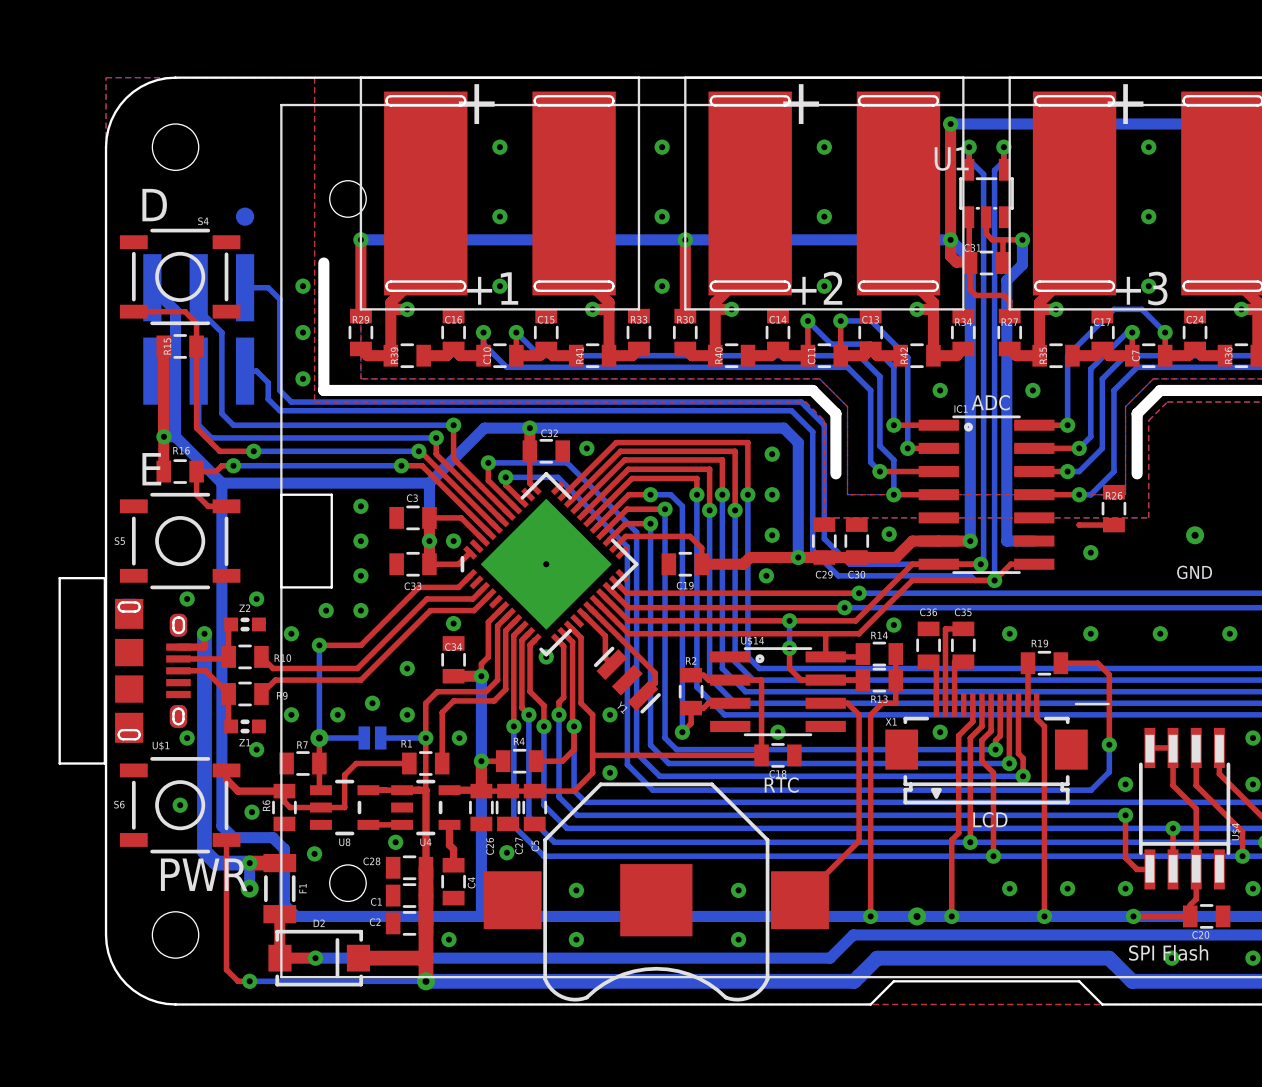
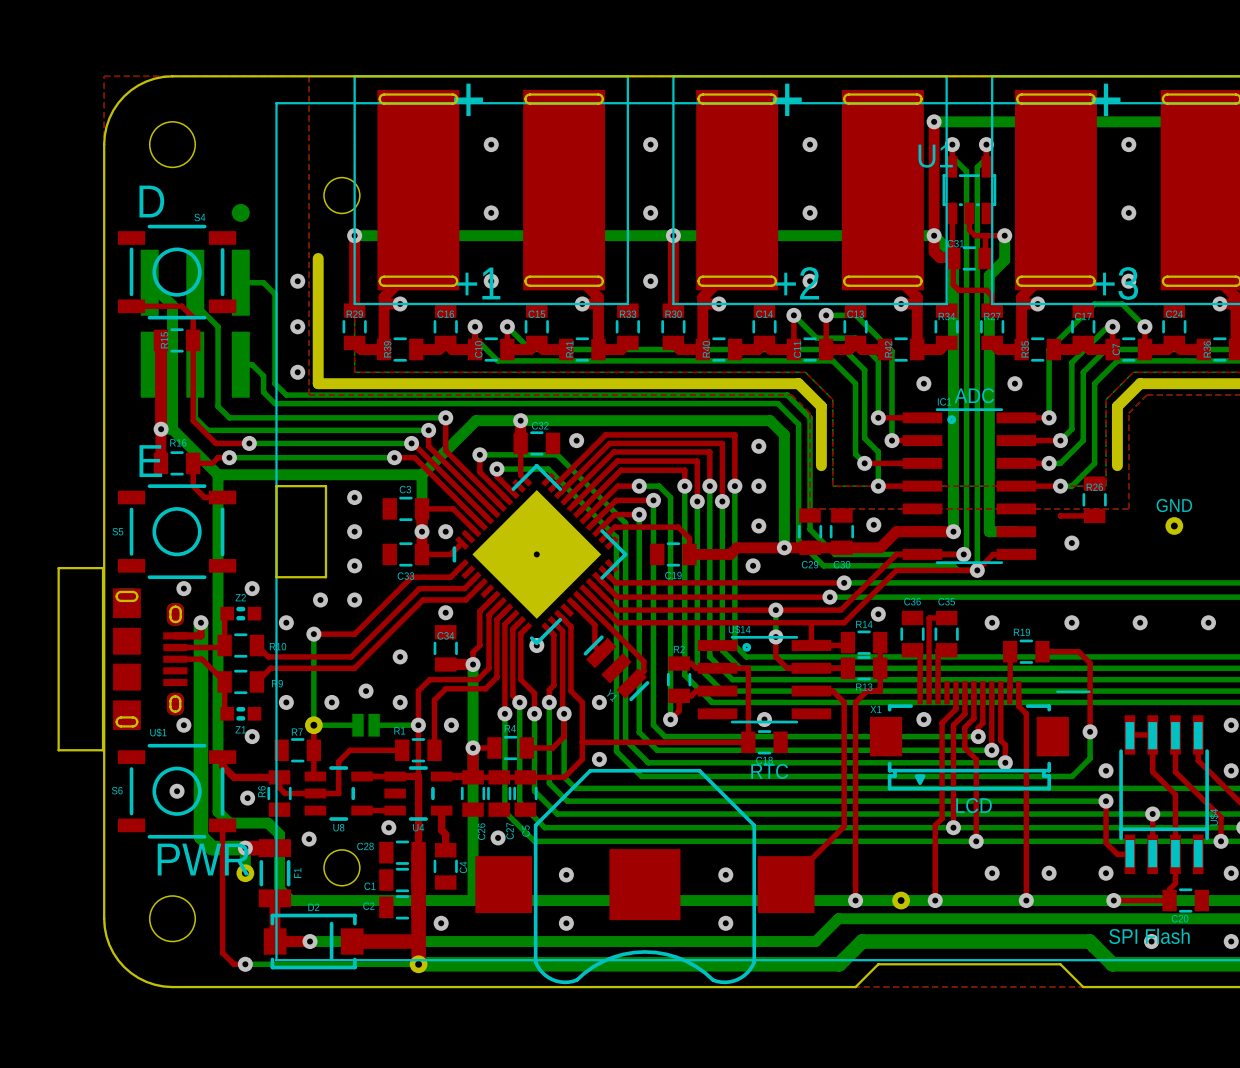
text position: GND (1194, 572) -> GND (1174, 505)

